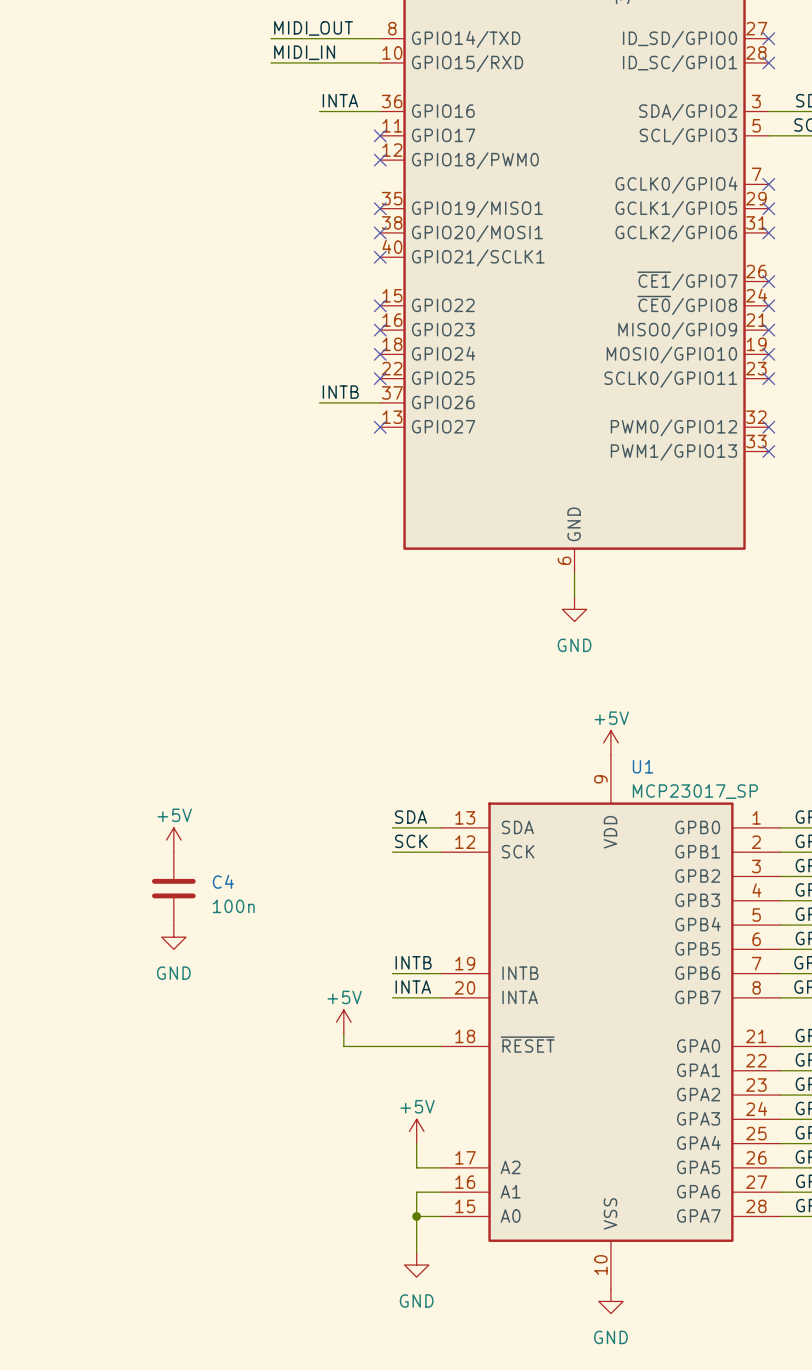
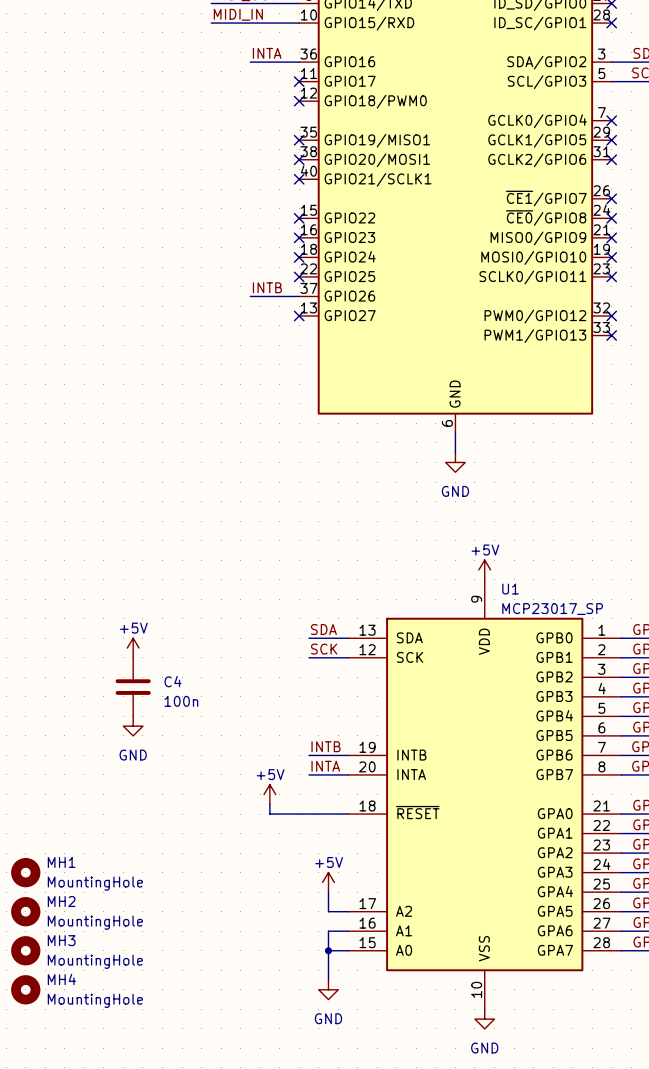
MH1: none -> MountingHole (25, 872)
MH2: none -> MountingHole (25, 911)
MH3: none -> MountingHole (25, 950)
MH4: none -> MountingHole (25, 989)

